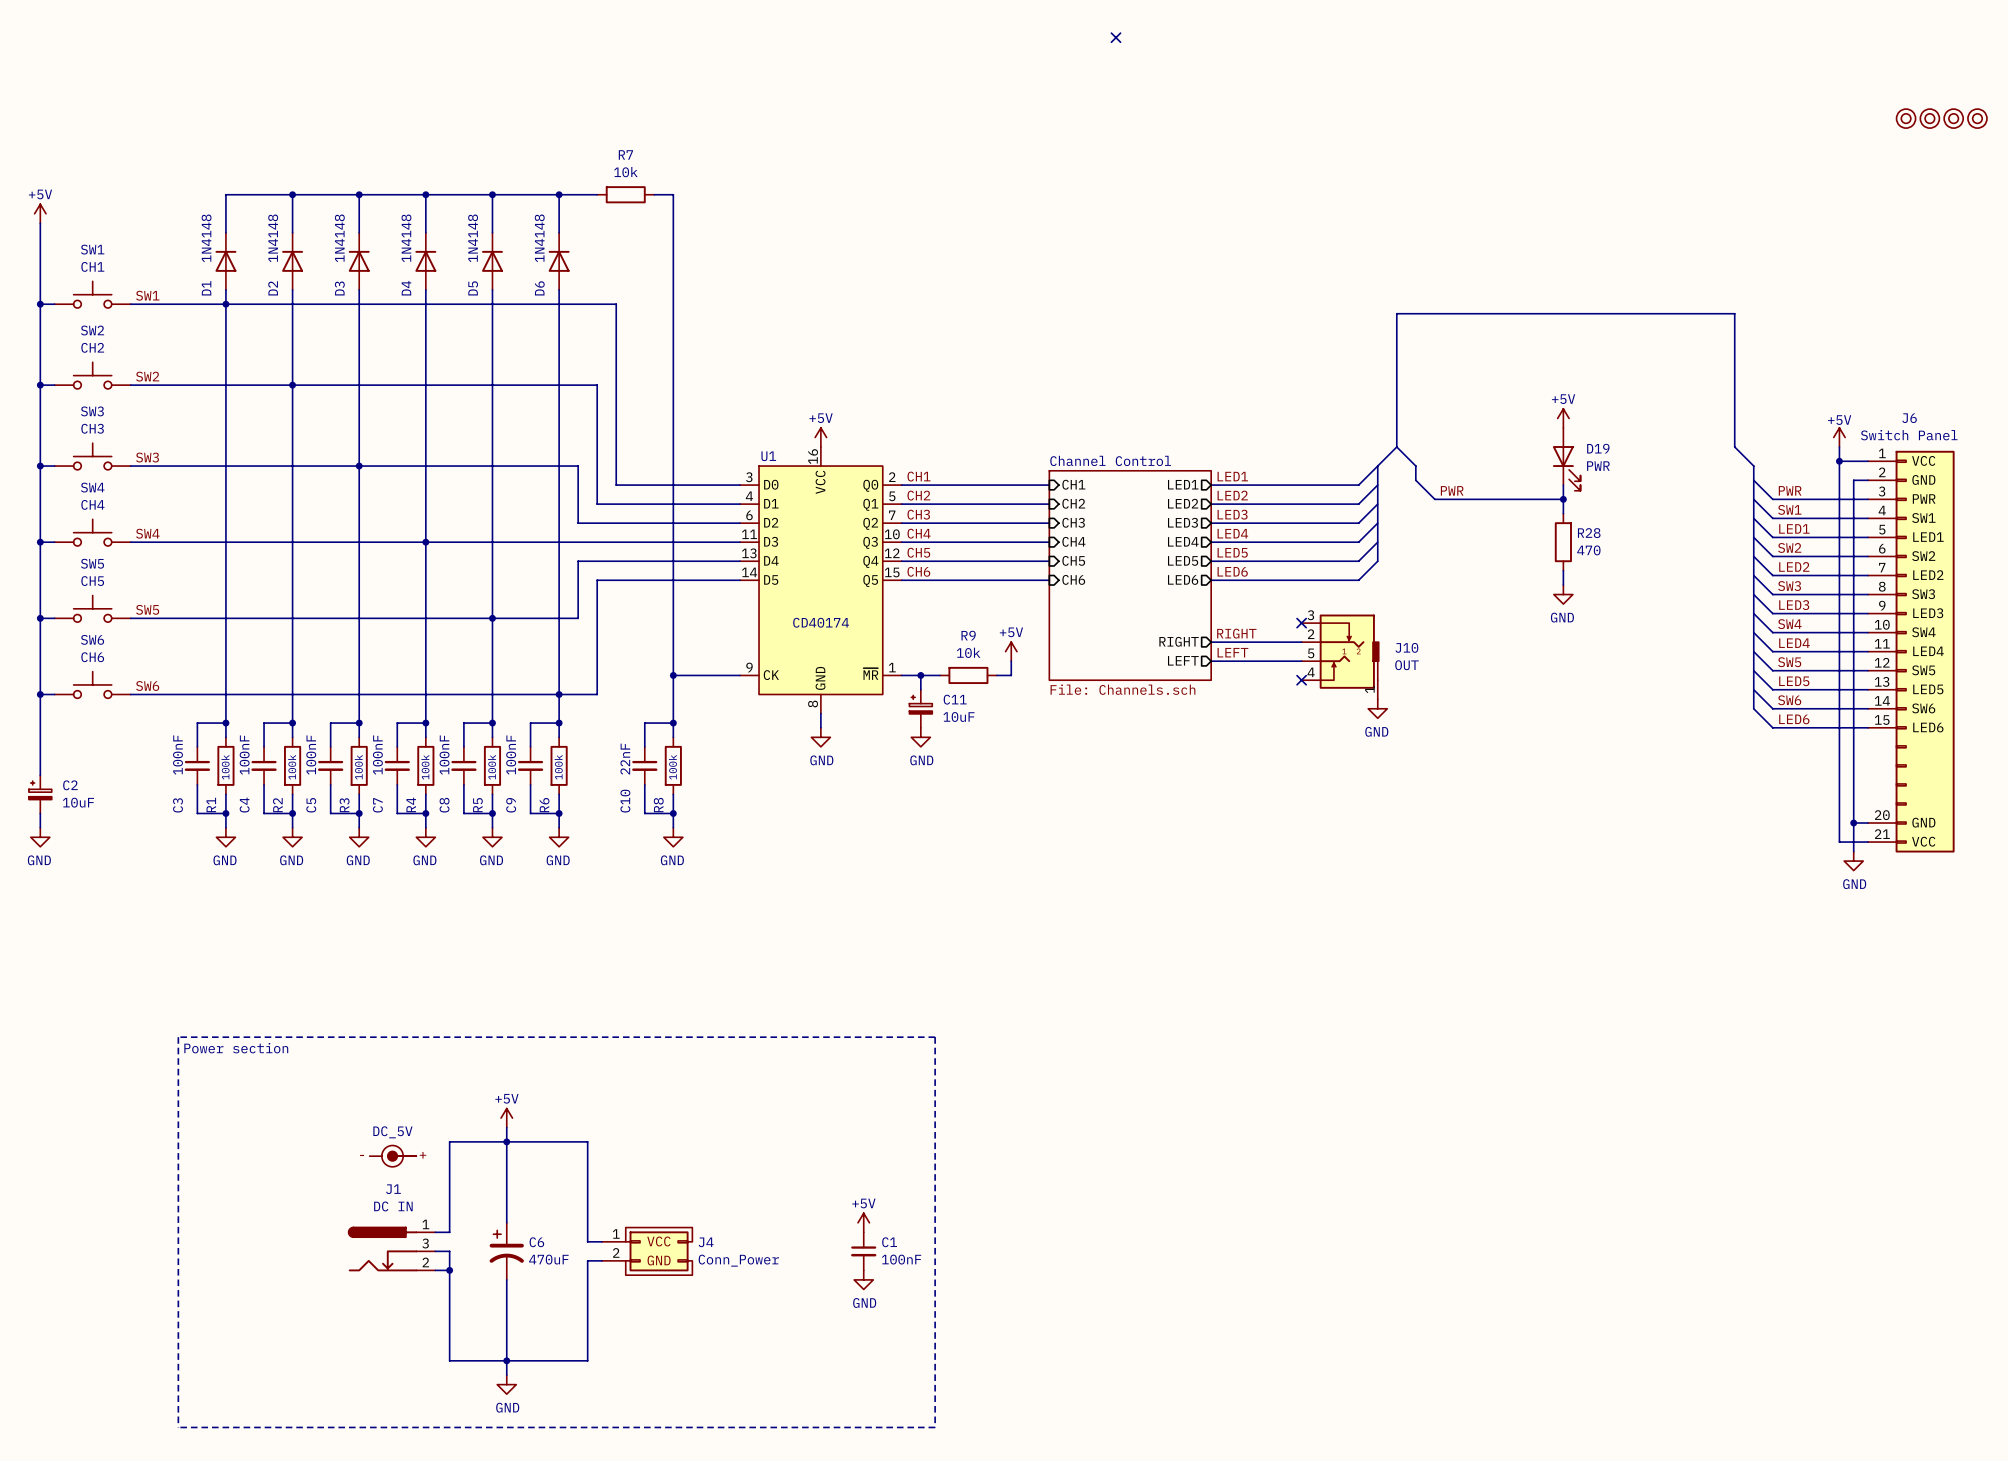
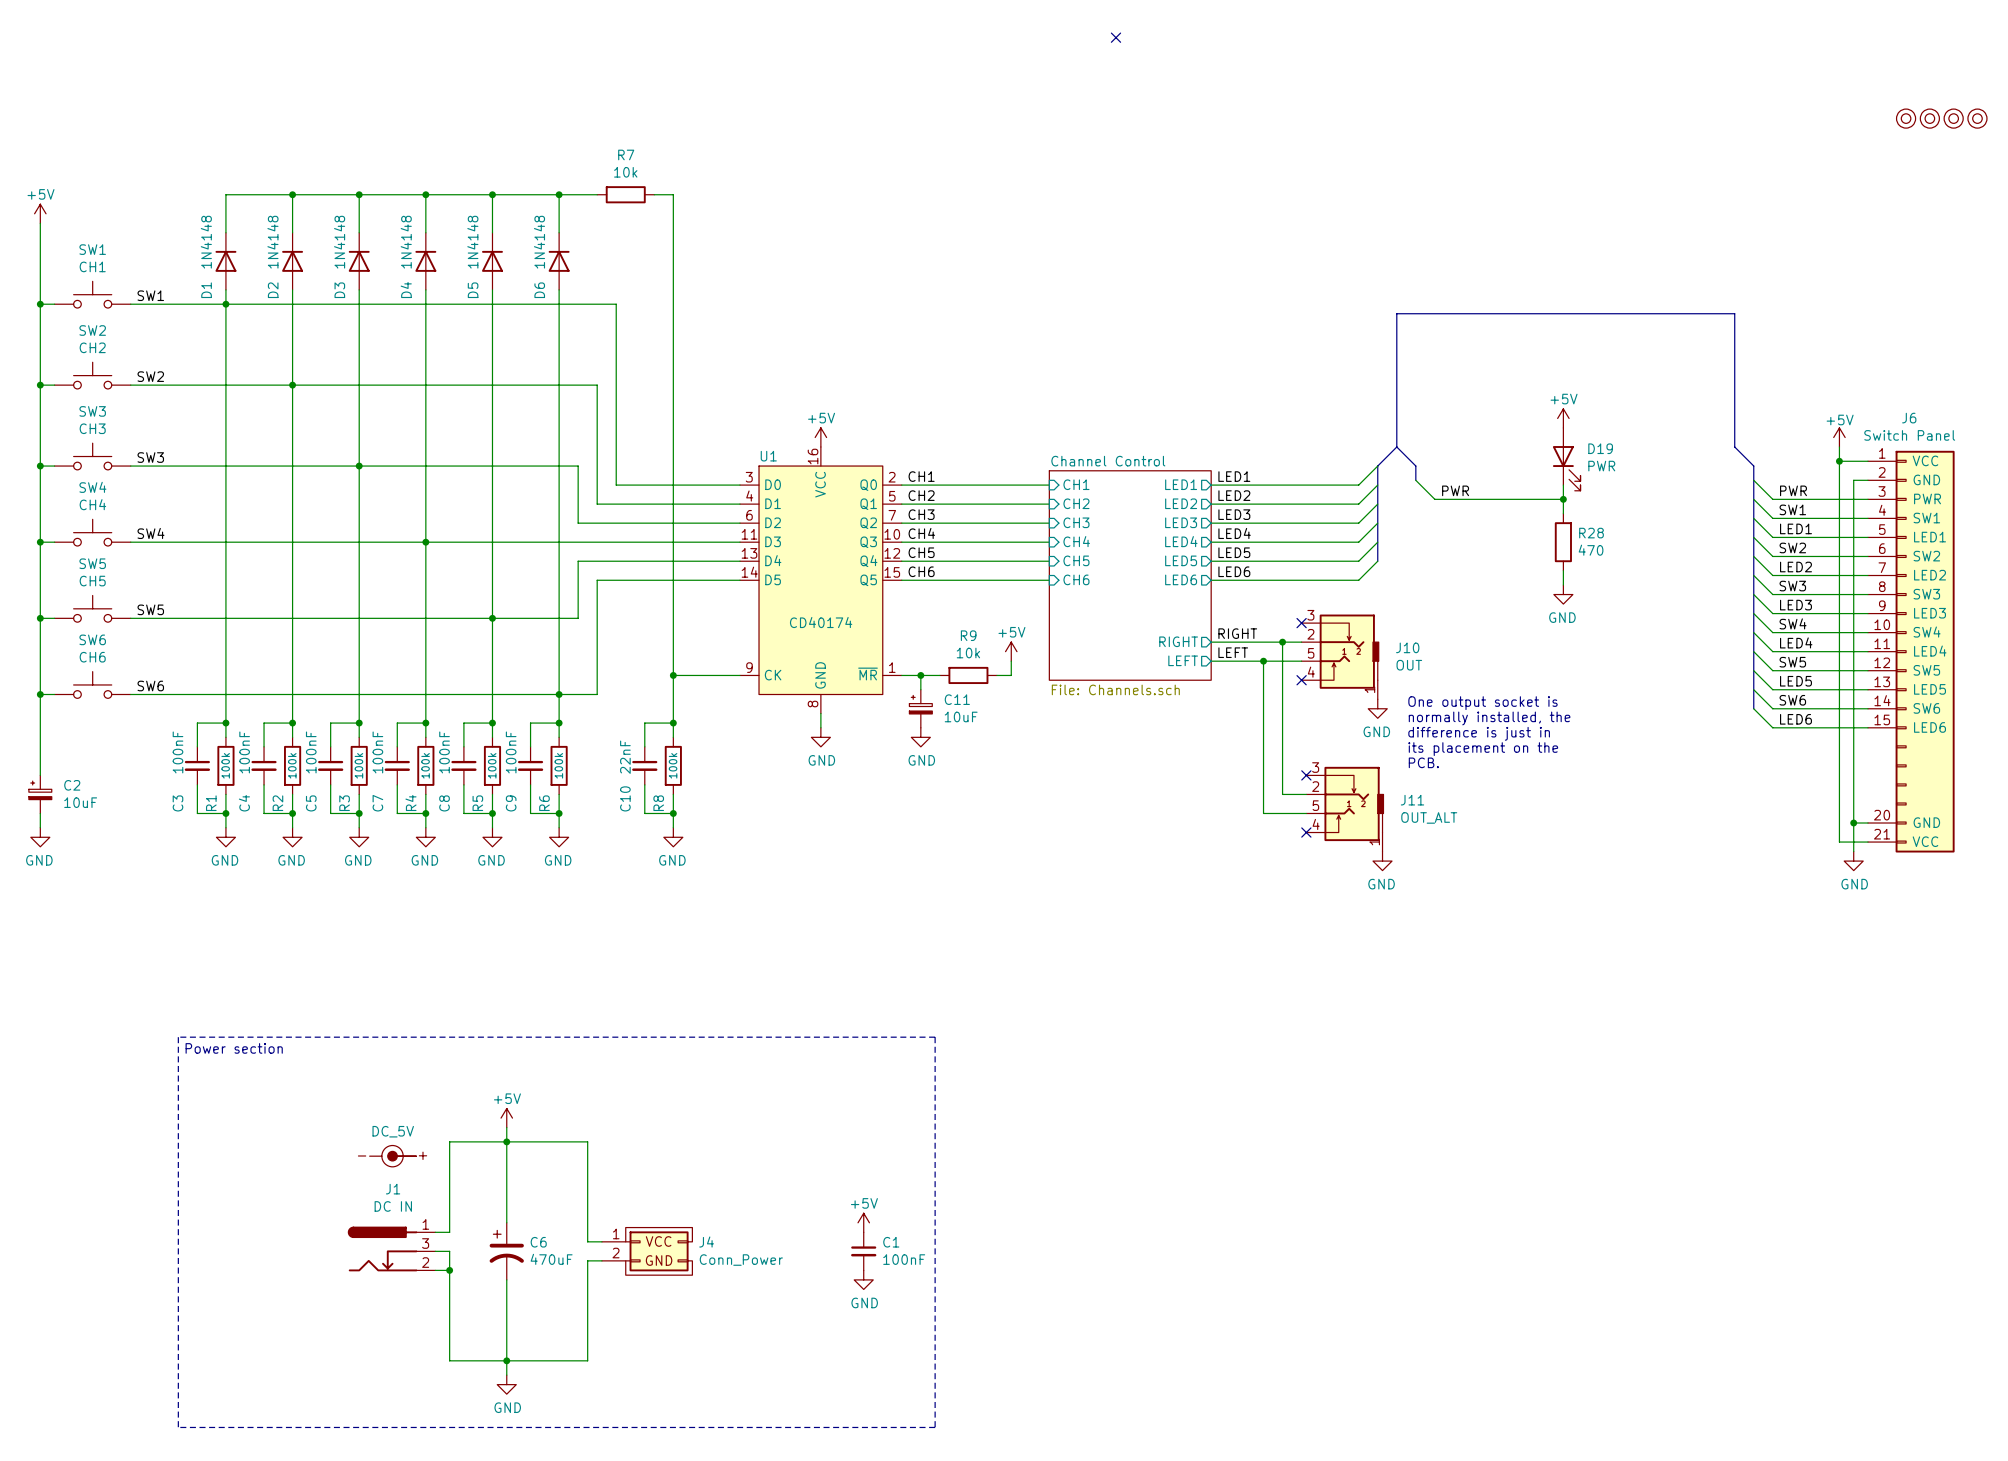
wire: none -> (1282, 642) (1282, 794) (1306, 794)
junction: none -> (1282, 642)
wire: none -> (1263, 661) (1263, 813) (1306, 813)
junction: none -> (1263, 661)
text: none -> One output socket is (1482, 703)
text: none -> normally installed, the (1489, 718)
text: none -> difference is just in (1479, 733)
text: none -> its placement on the (1483, 749)
text: none -> PCB. (1423, 762)
no-connect mark: none -> (1306, 775)
J11: none -> OUT_ALT (1344, 809)
no-connect mark: none -> (1306, 832)
power symbol: none -> GND (1382, 861)

